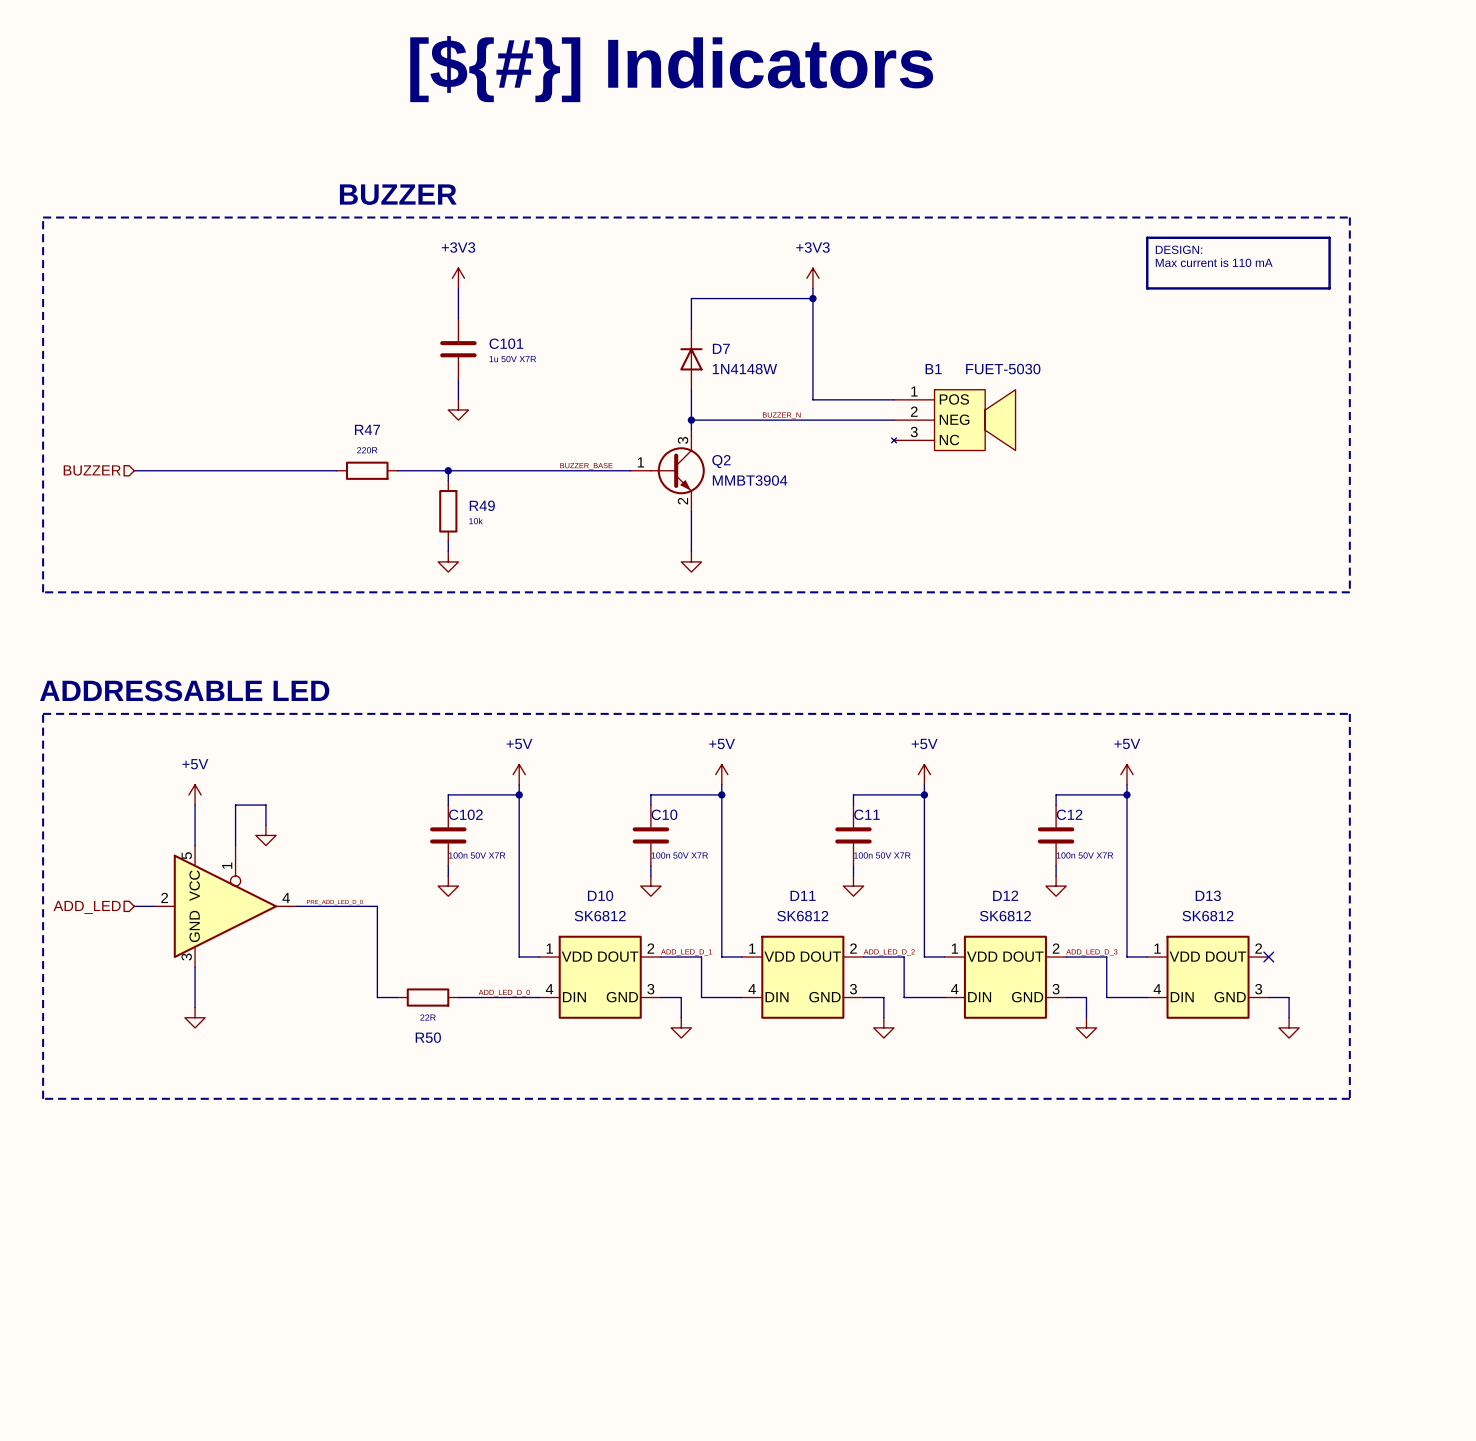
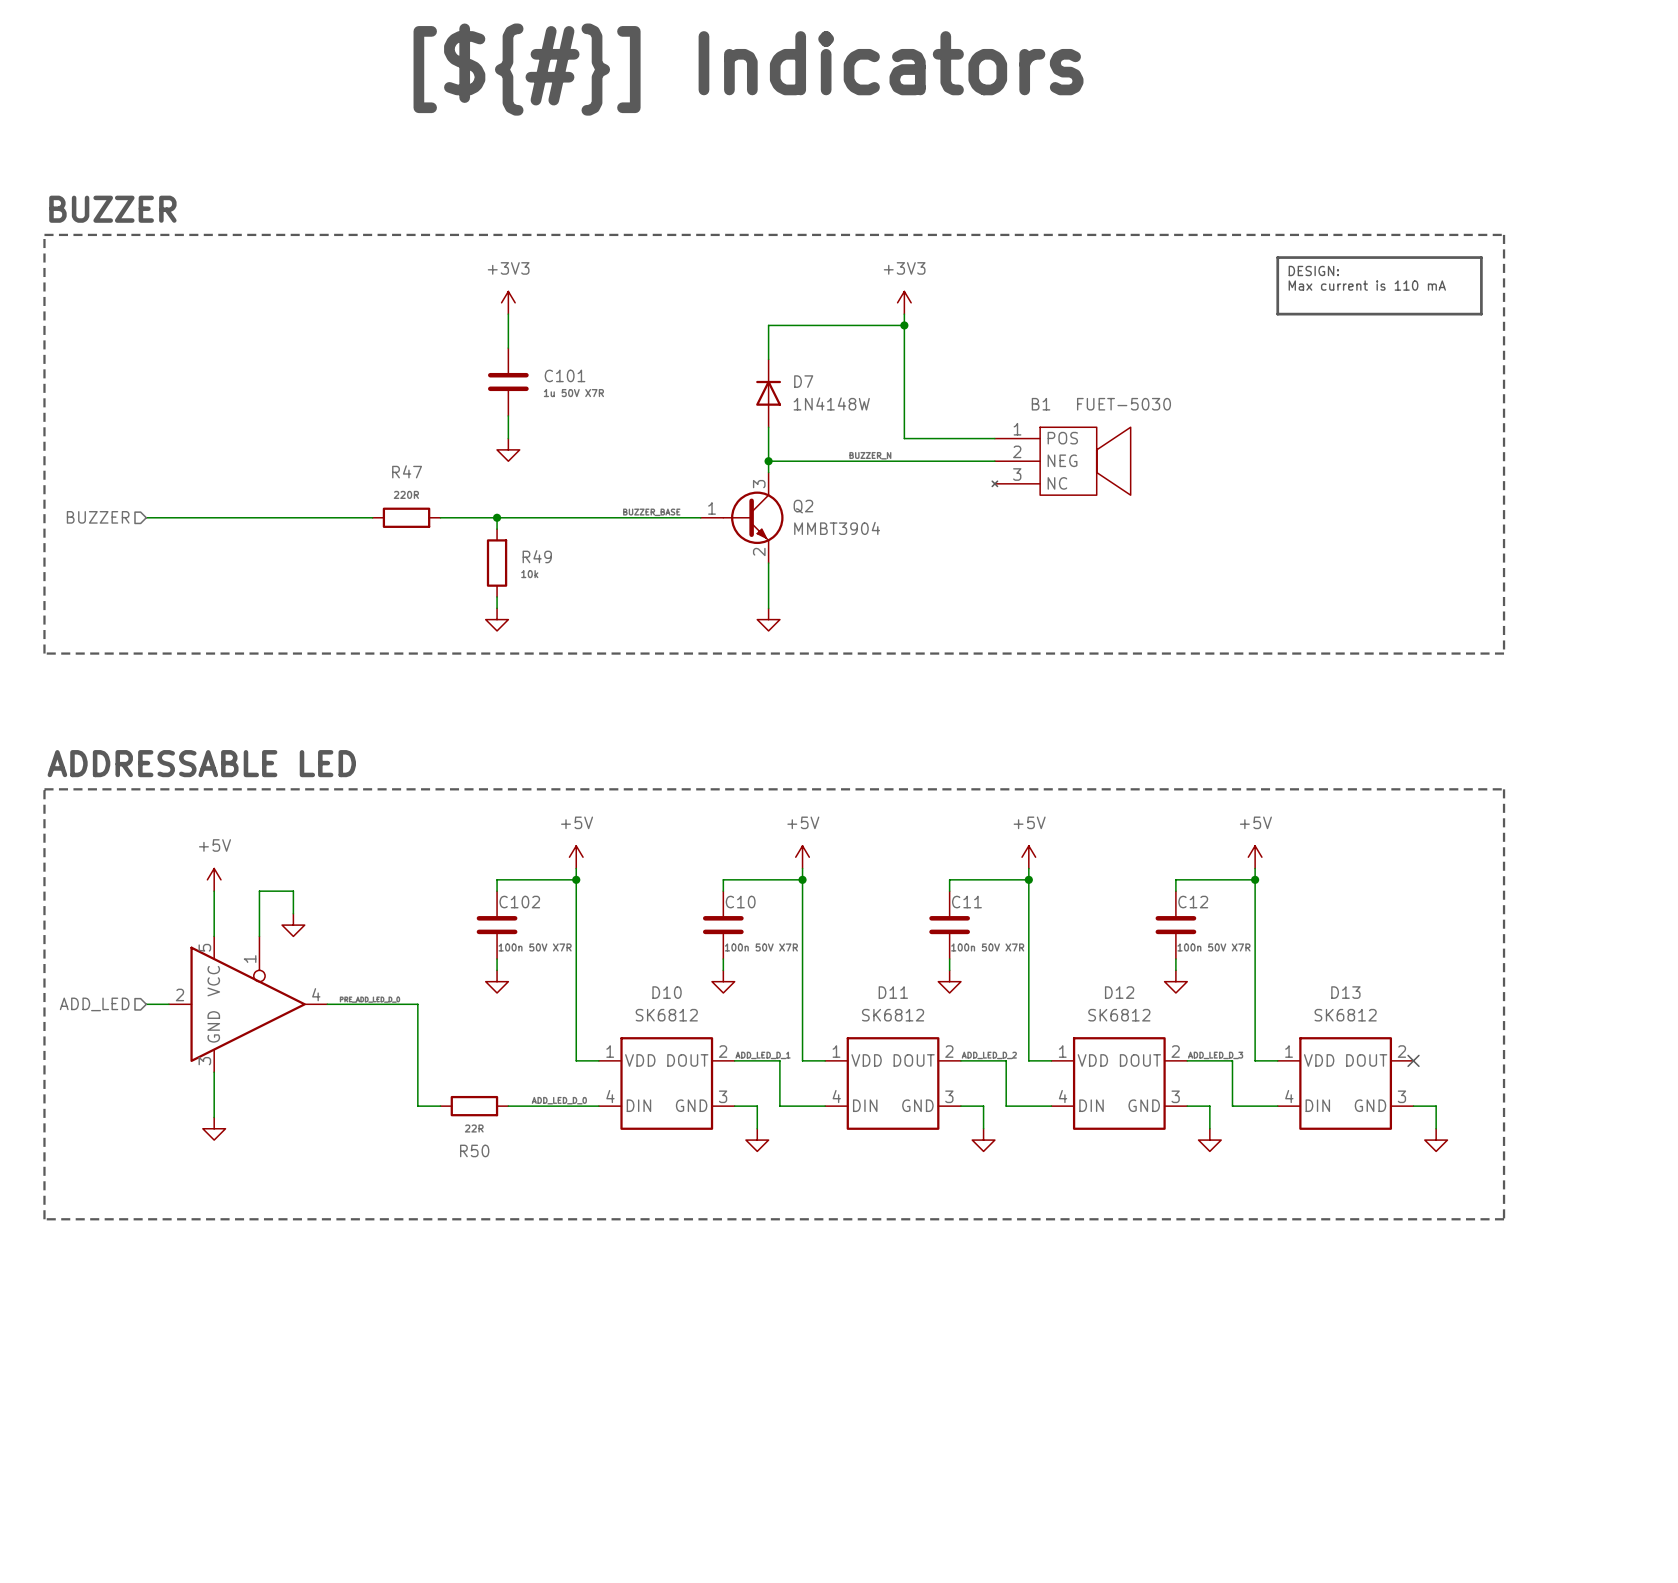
text: none -> BUZZER (112, 209)
text: BUZZER (398, 194) -> none

